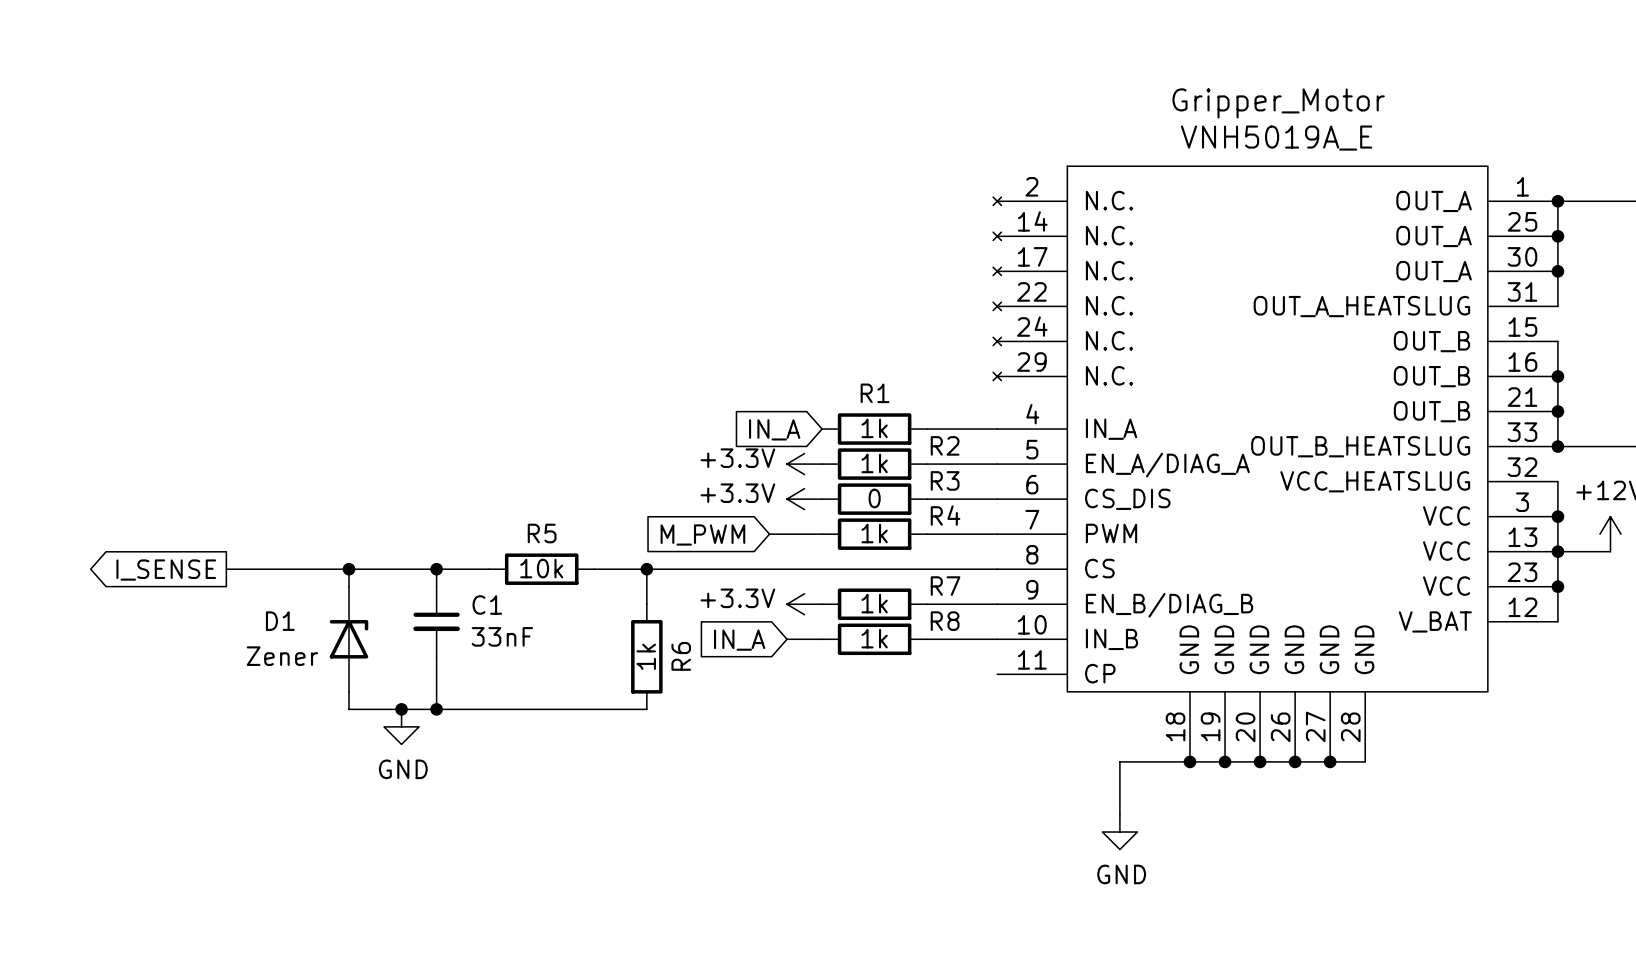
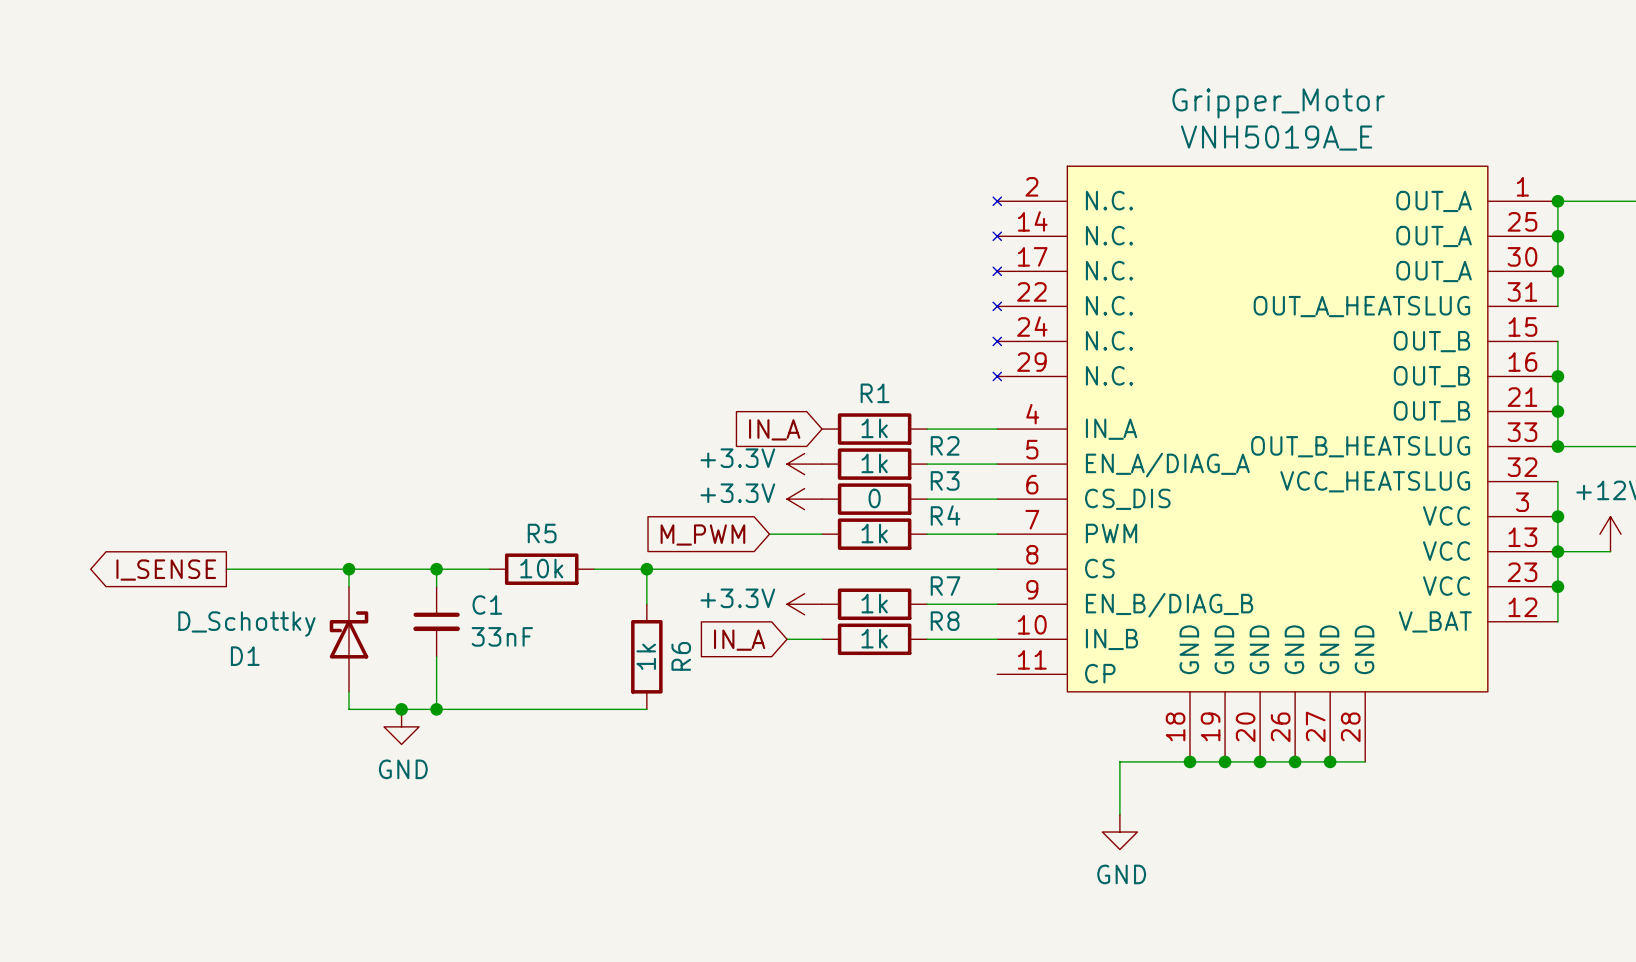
D1: Zener (349, 639) -> none
D_Schottky: none -> D1 (349, 639)

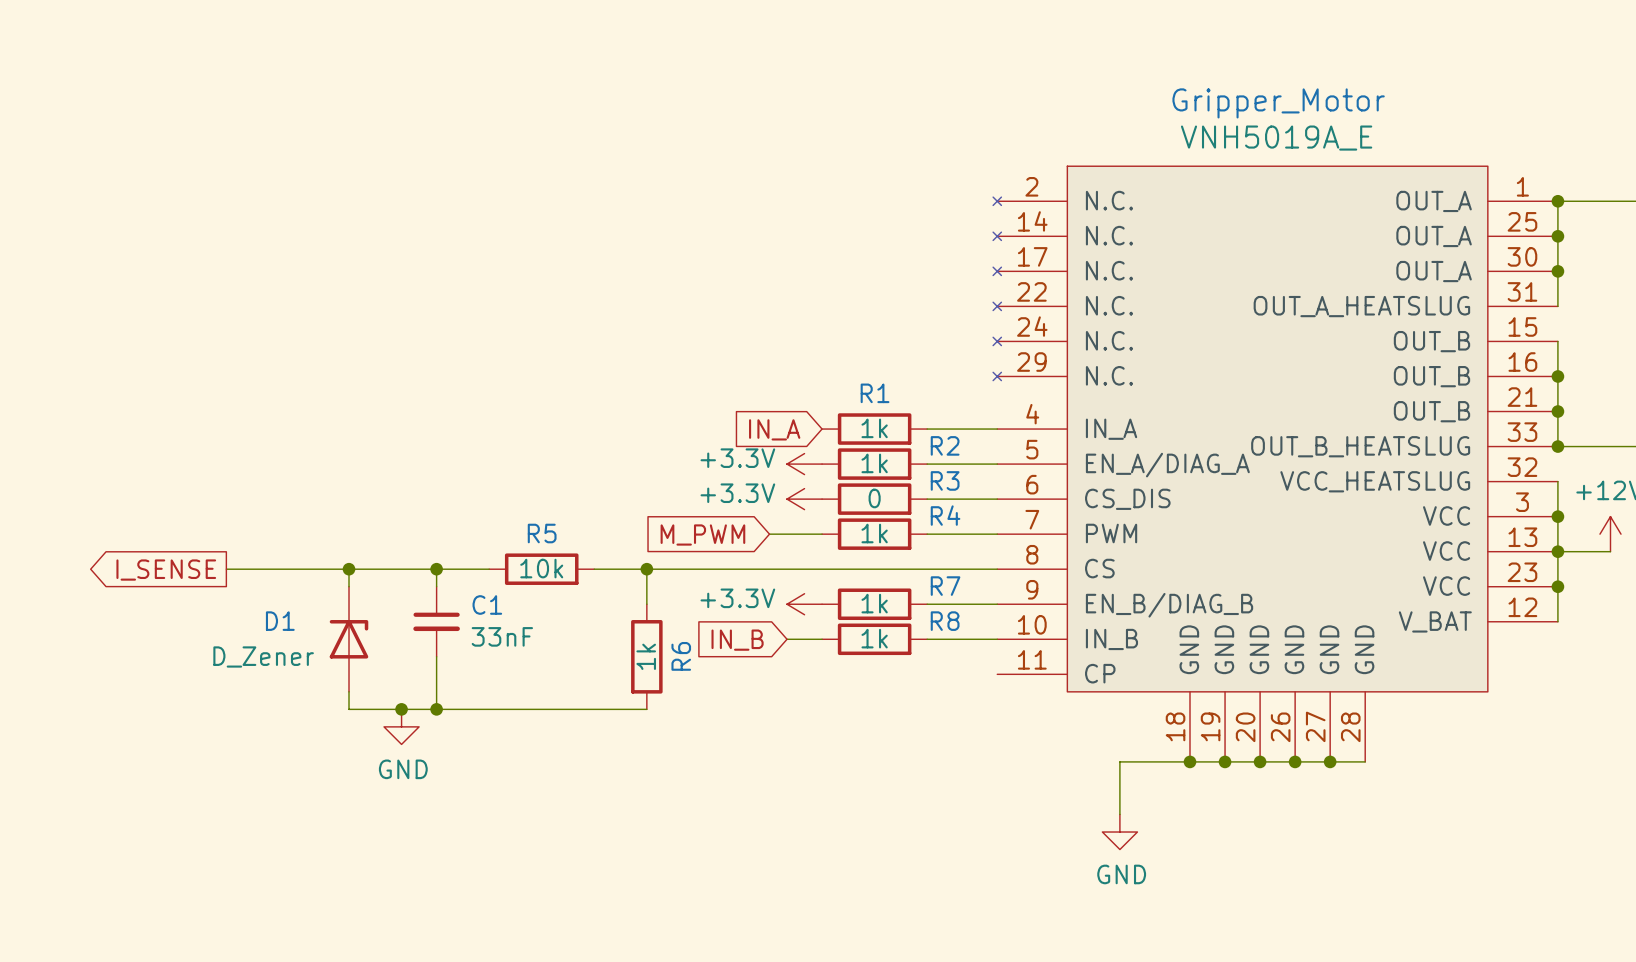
D_Schottky: D1 (349, 639) -> none
D1: none -> D_Zener (349, 639)
global label: IN_A (739, 640) -> IN_B (737, 640)

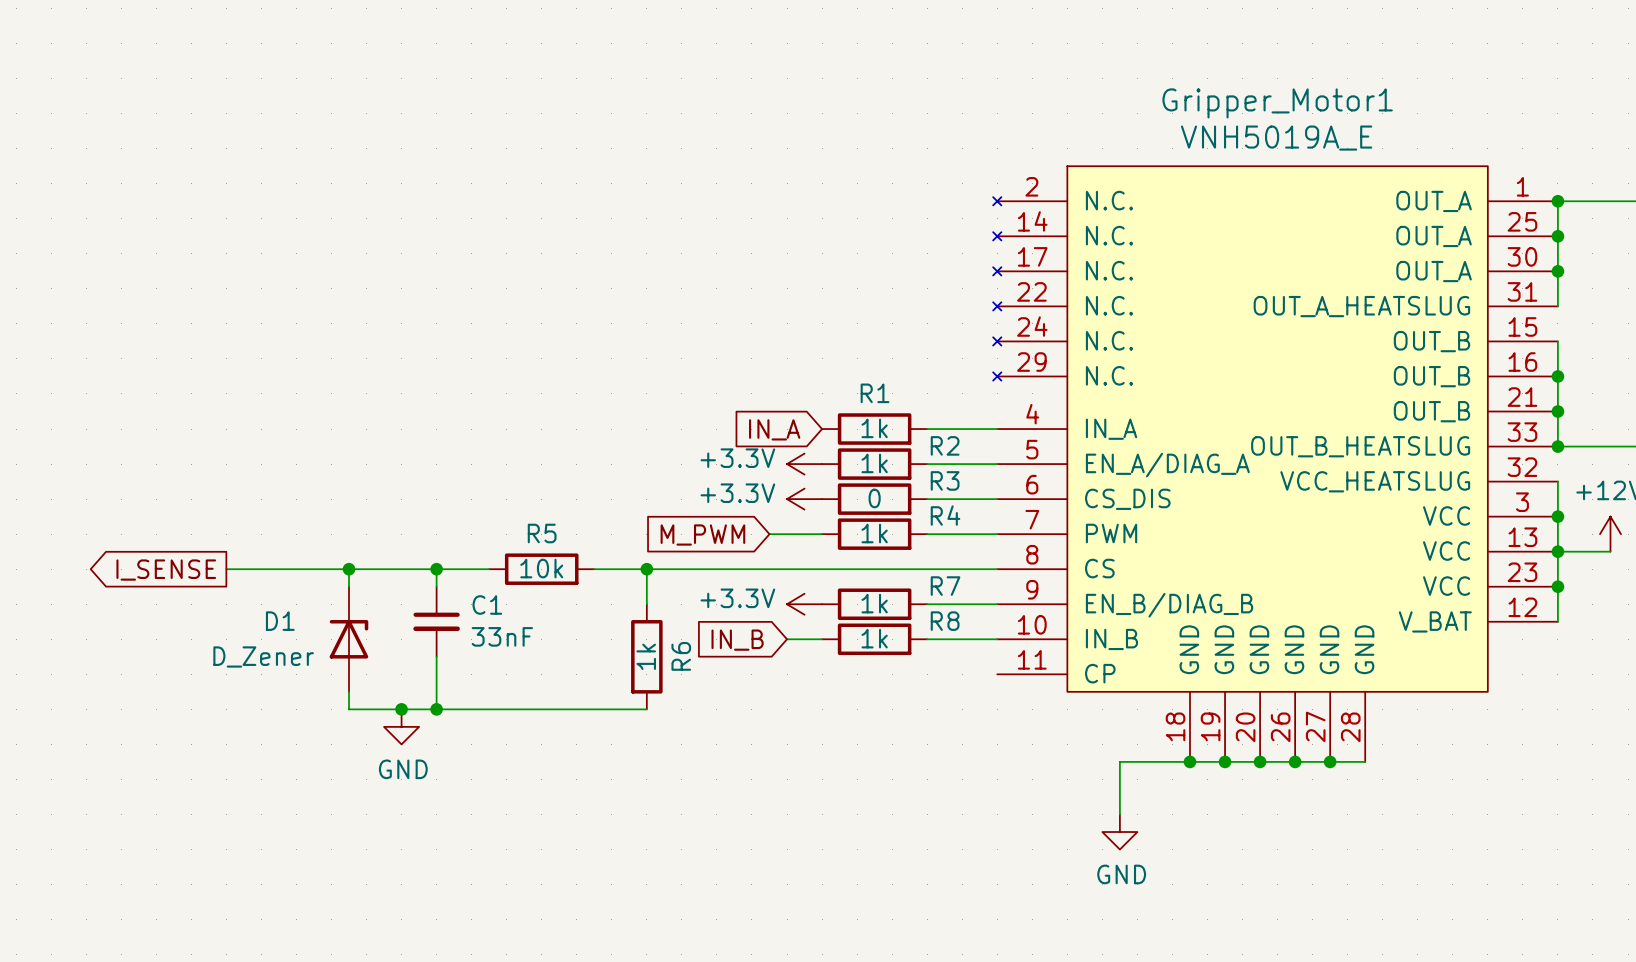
Gripper_Motor name: Gripper_Motor (1278, 103) -> Gripper_Motor1 (1277, 103)

